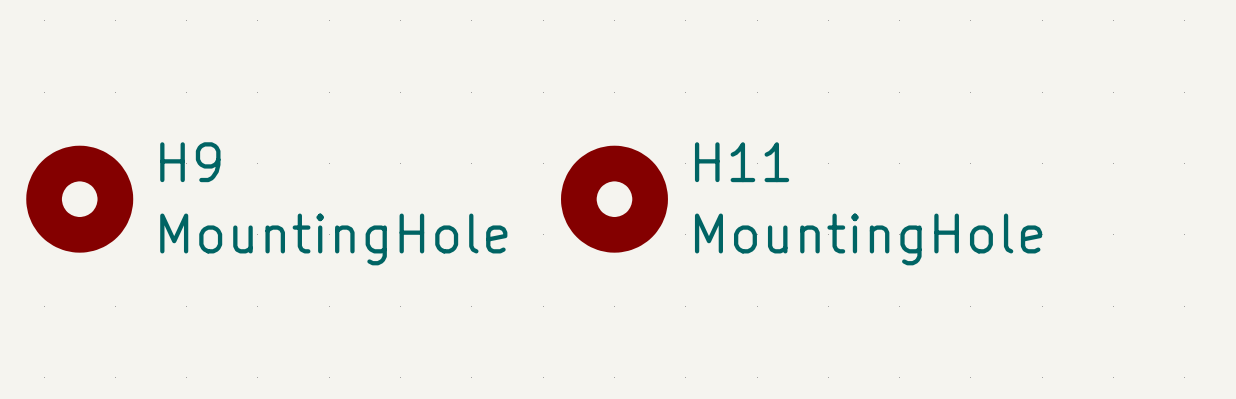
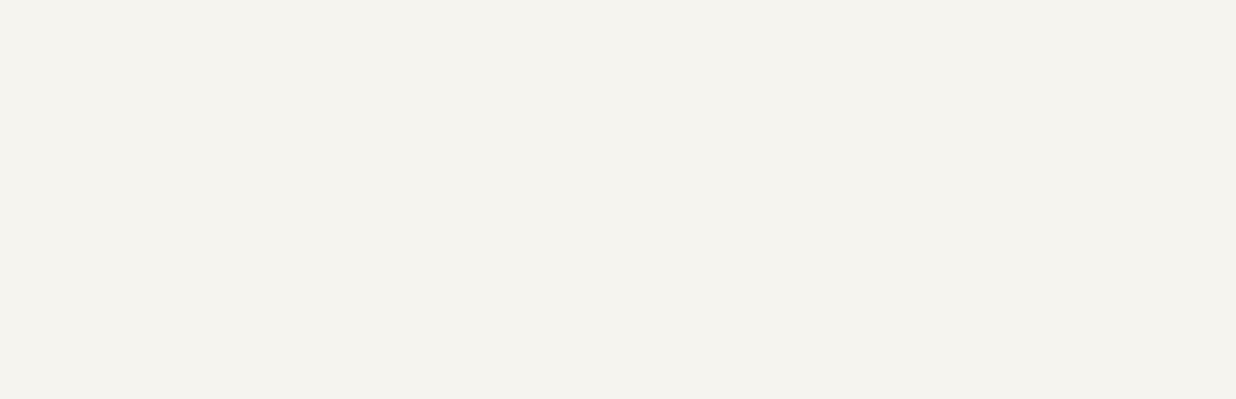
H9: MountingHole (79, 199) -> none
H11: MountingHole (614, 199) -> none

